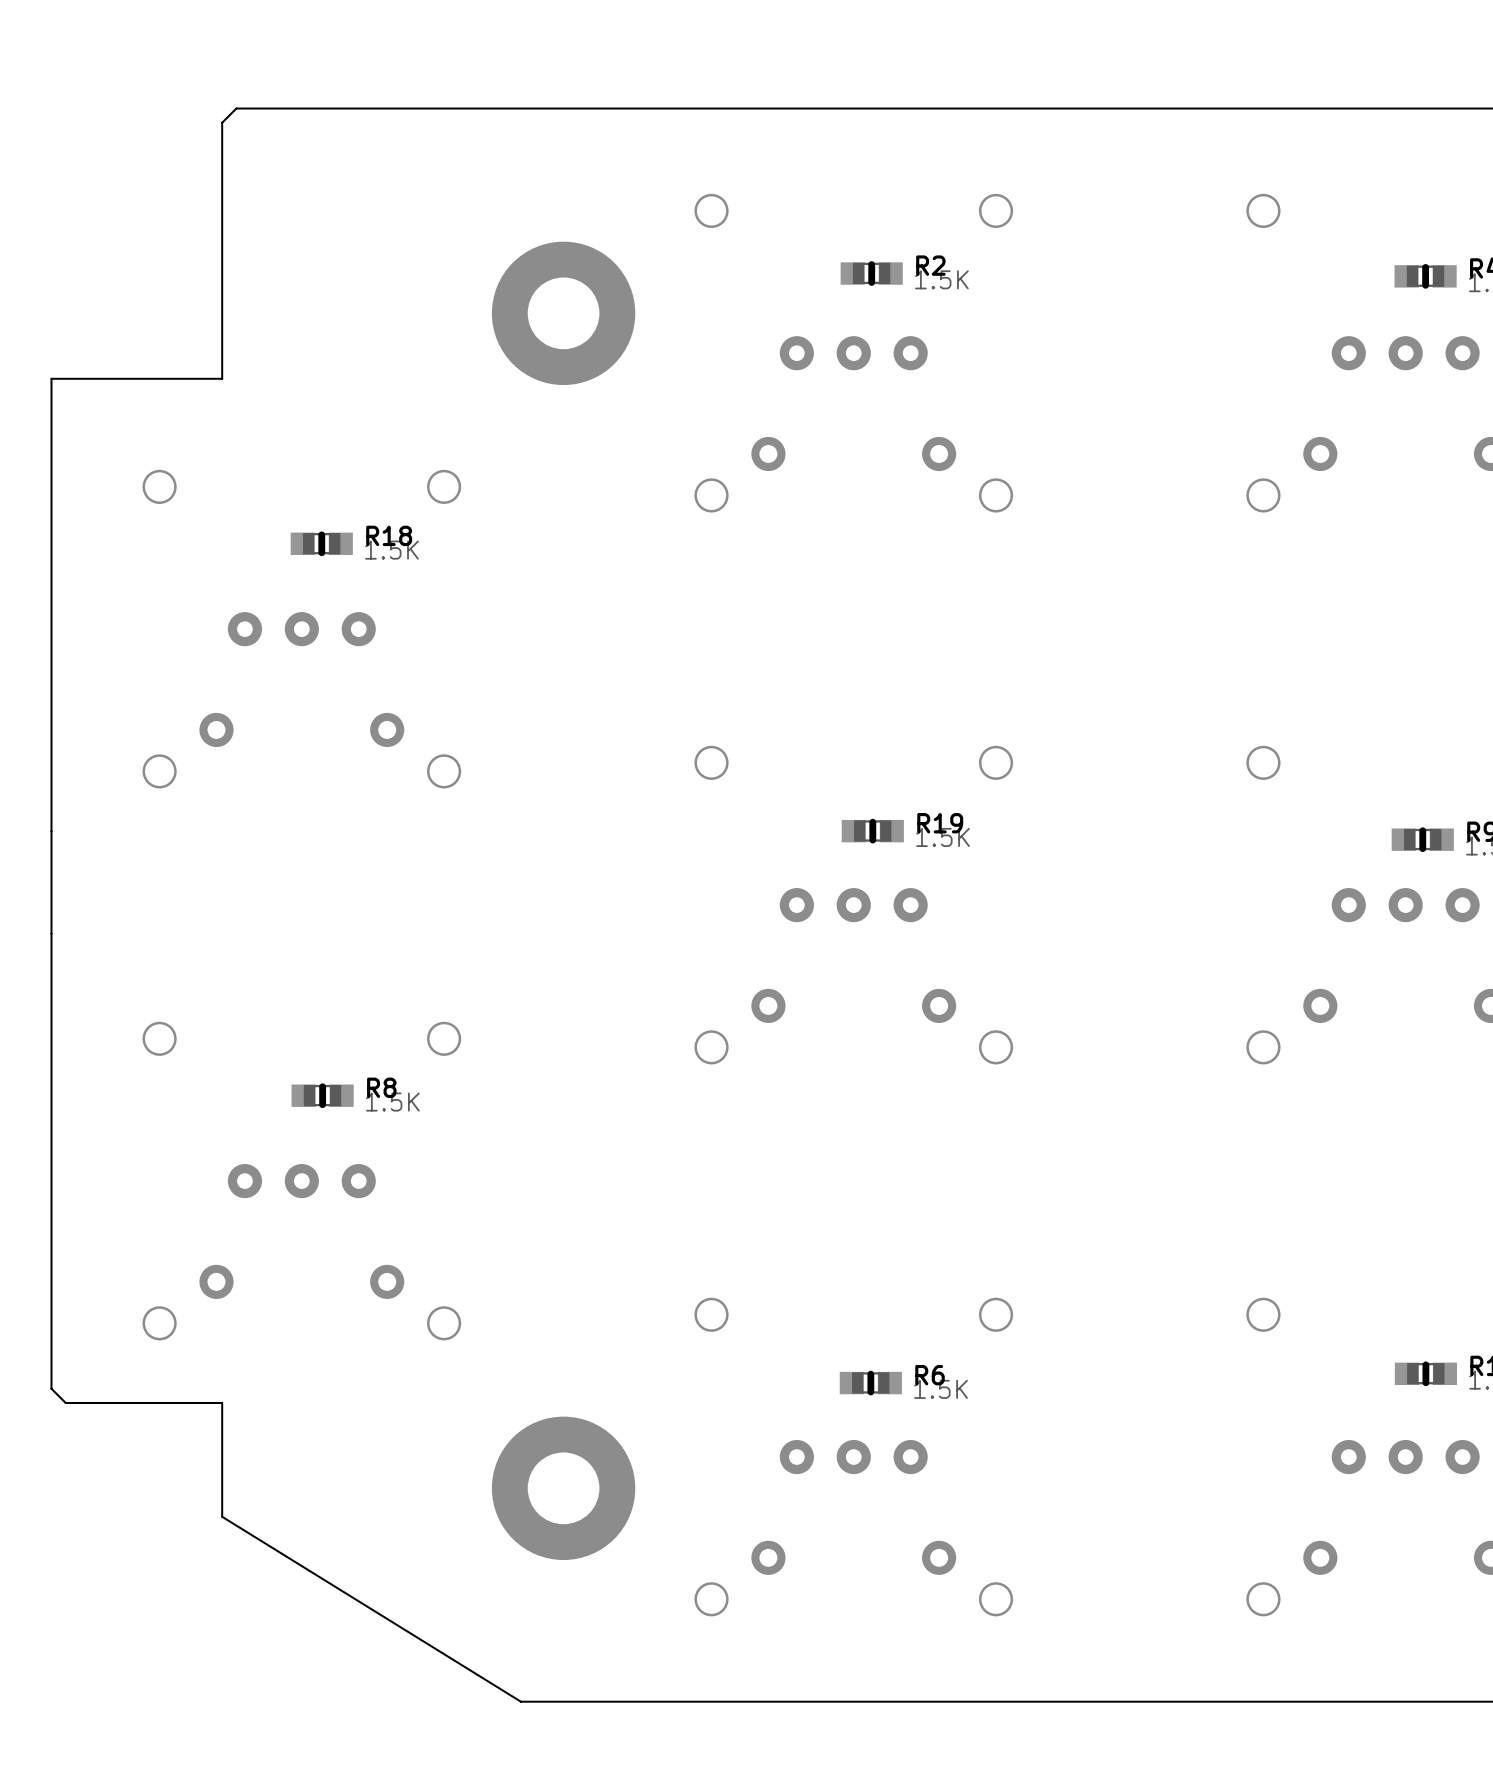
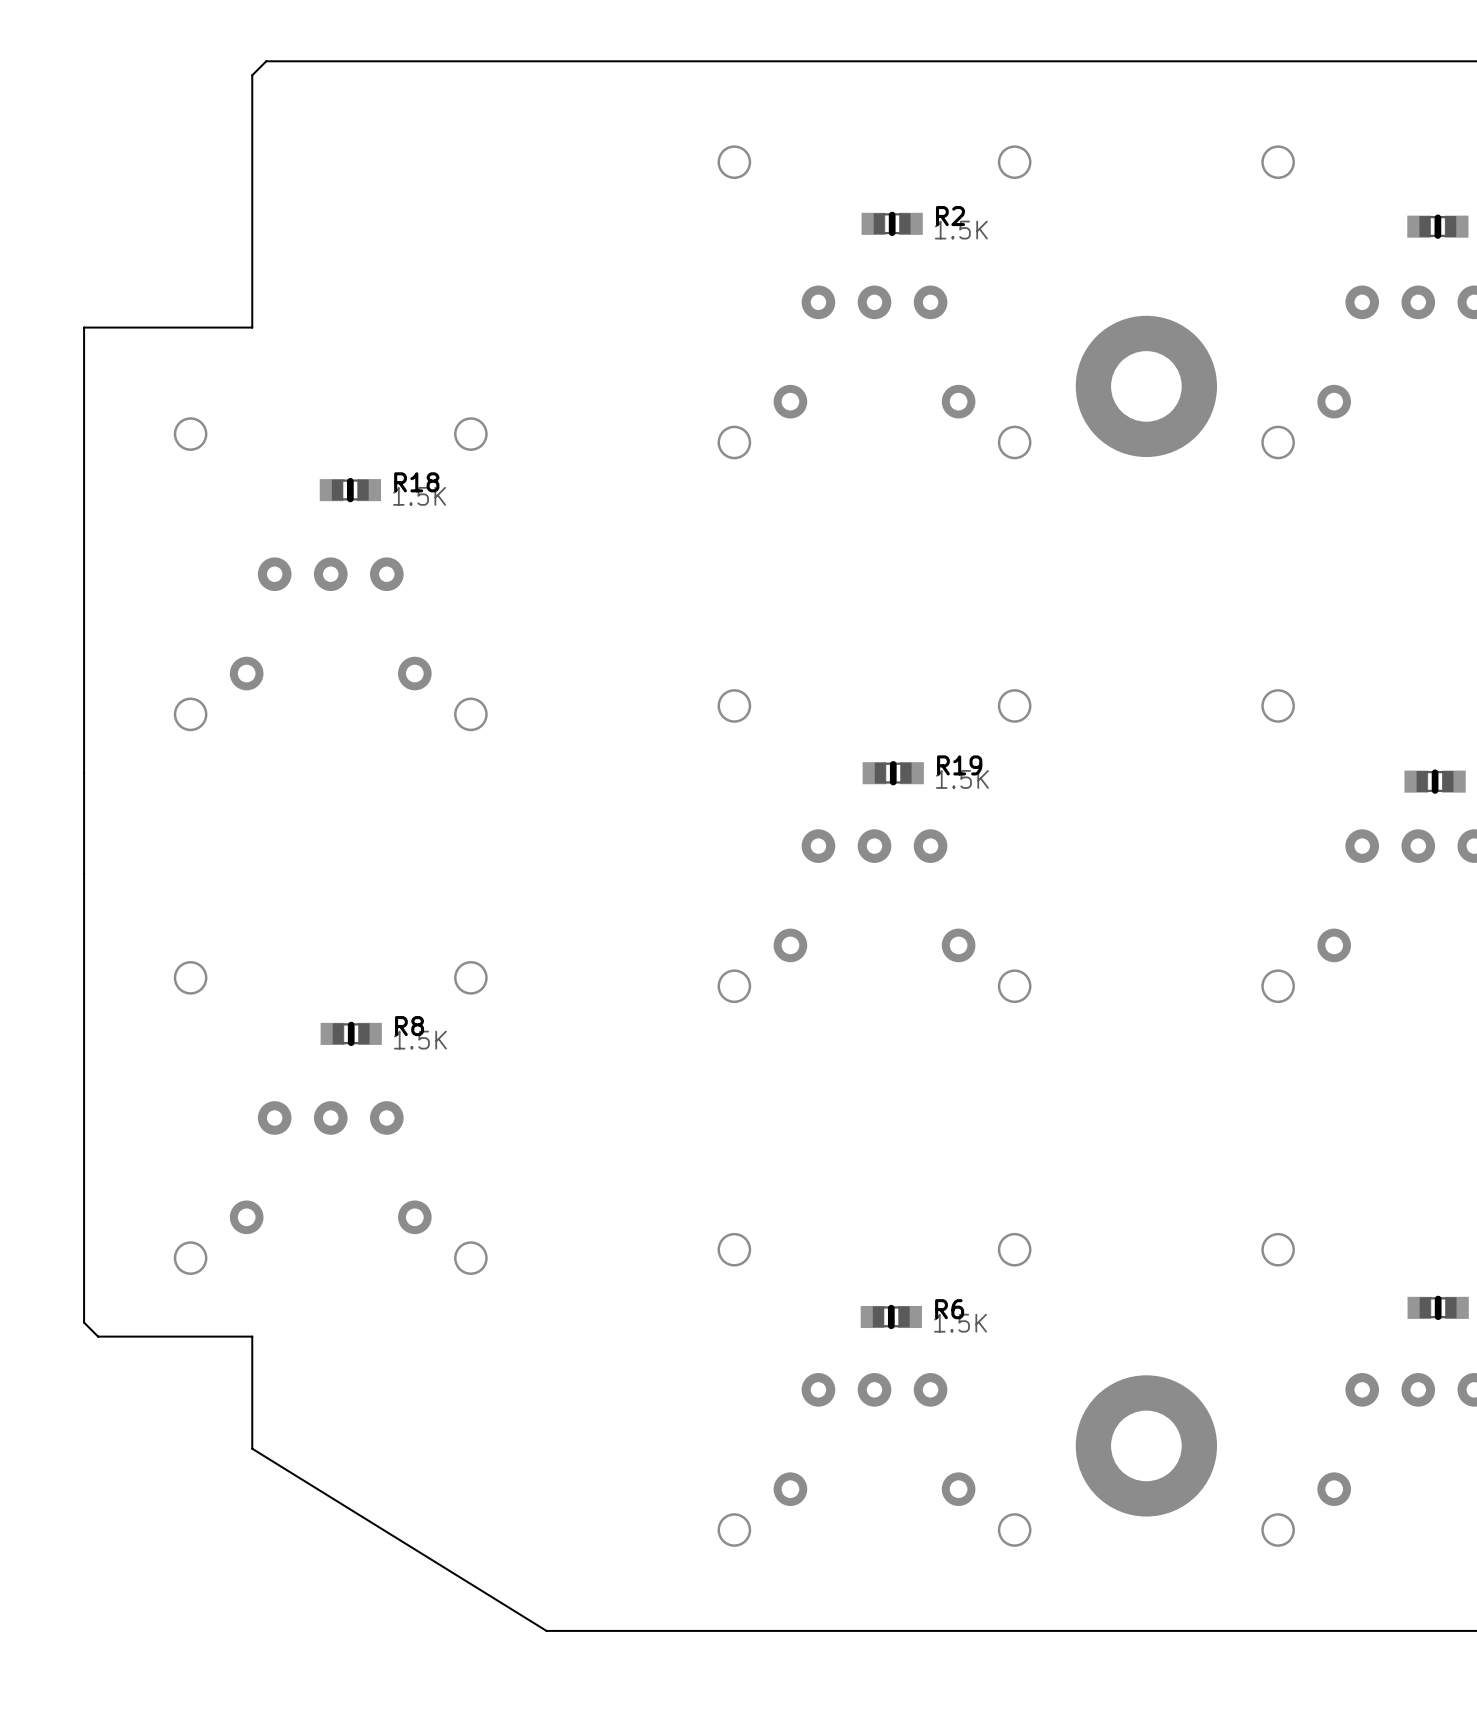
part: (563, 313) -> none
part: none -> (1146, 386)
part: (563, 1488) -> none
part: none -> (1146, 1445)

